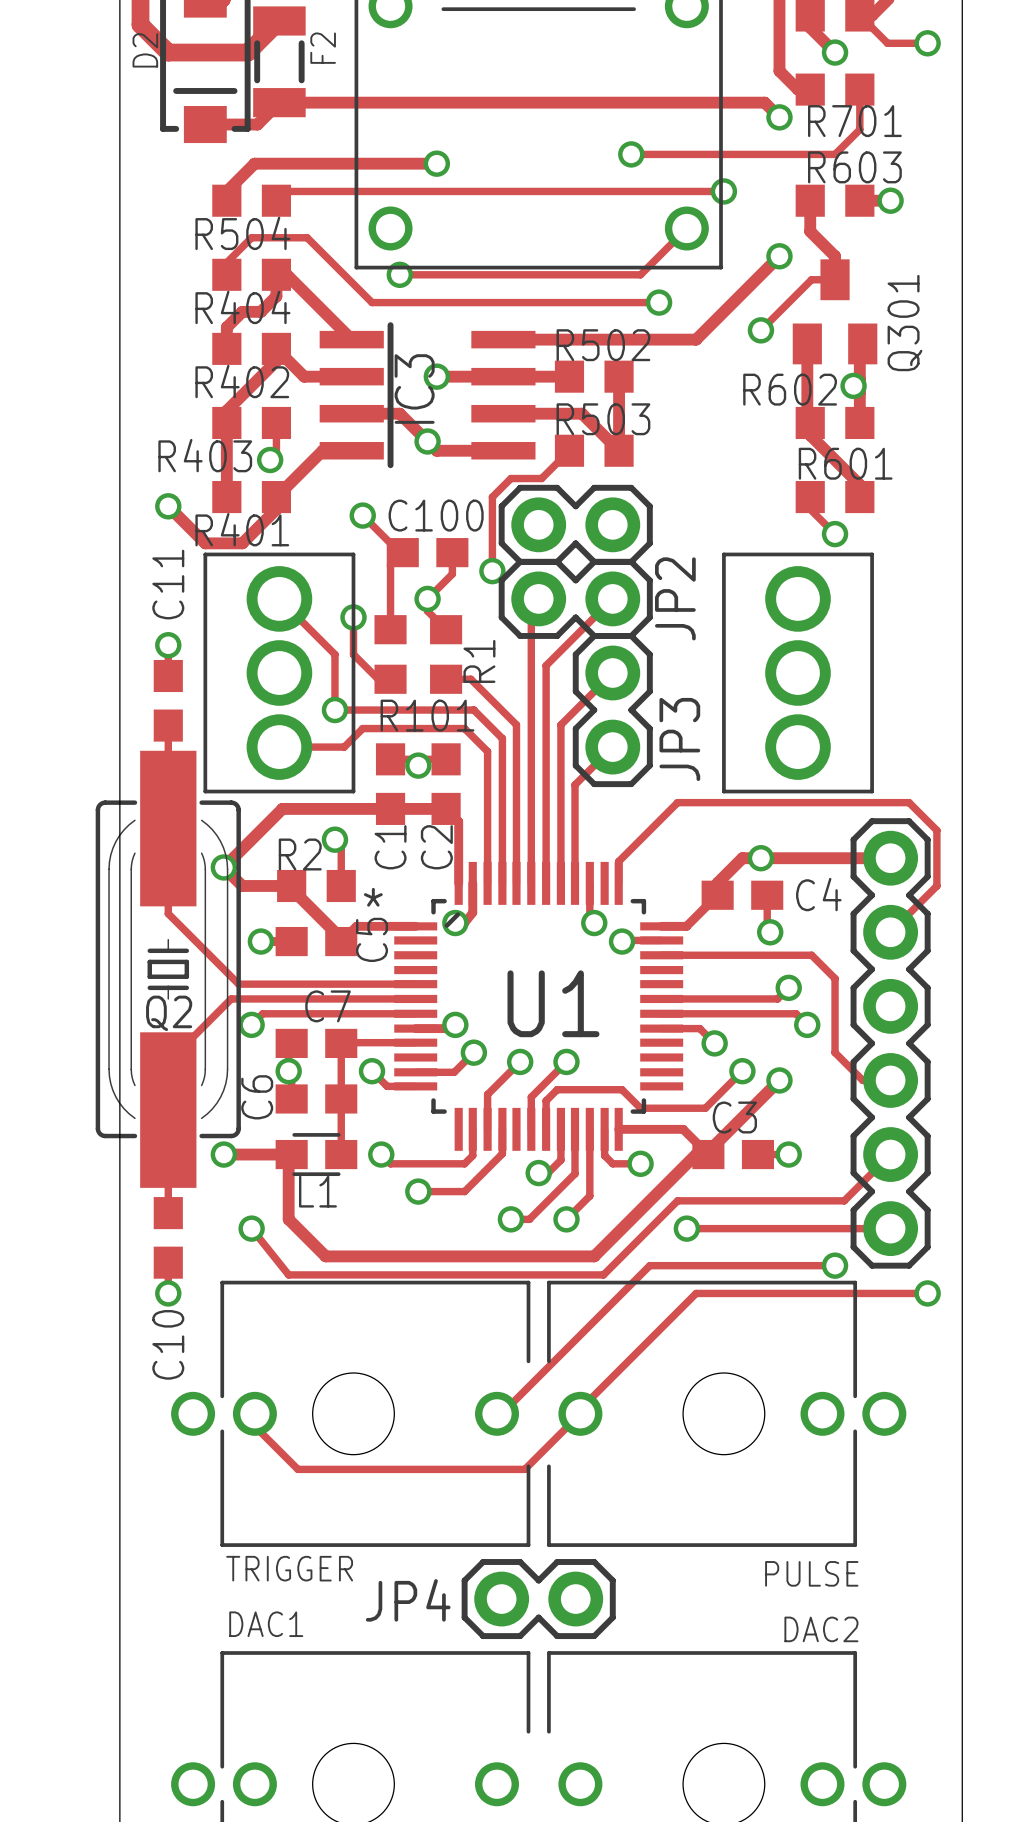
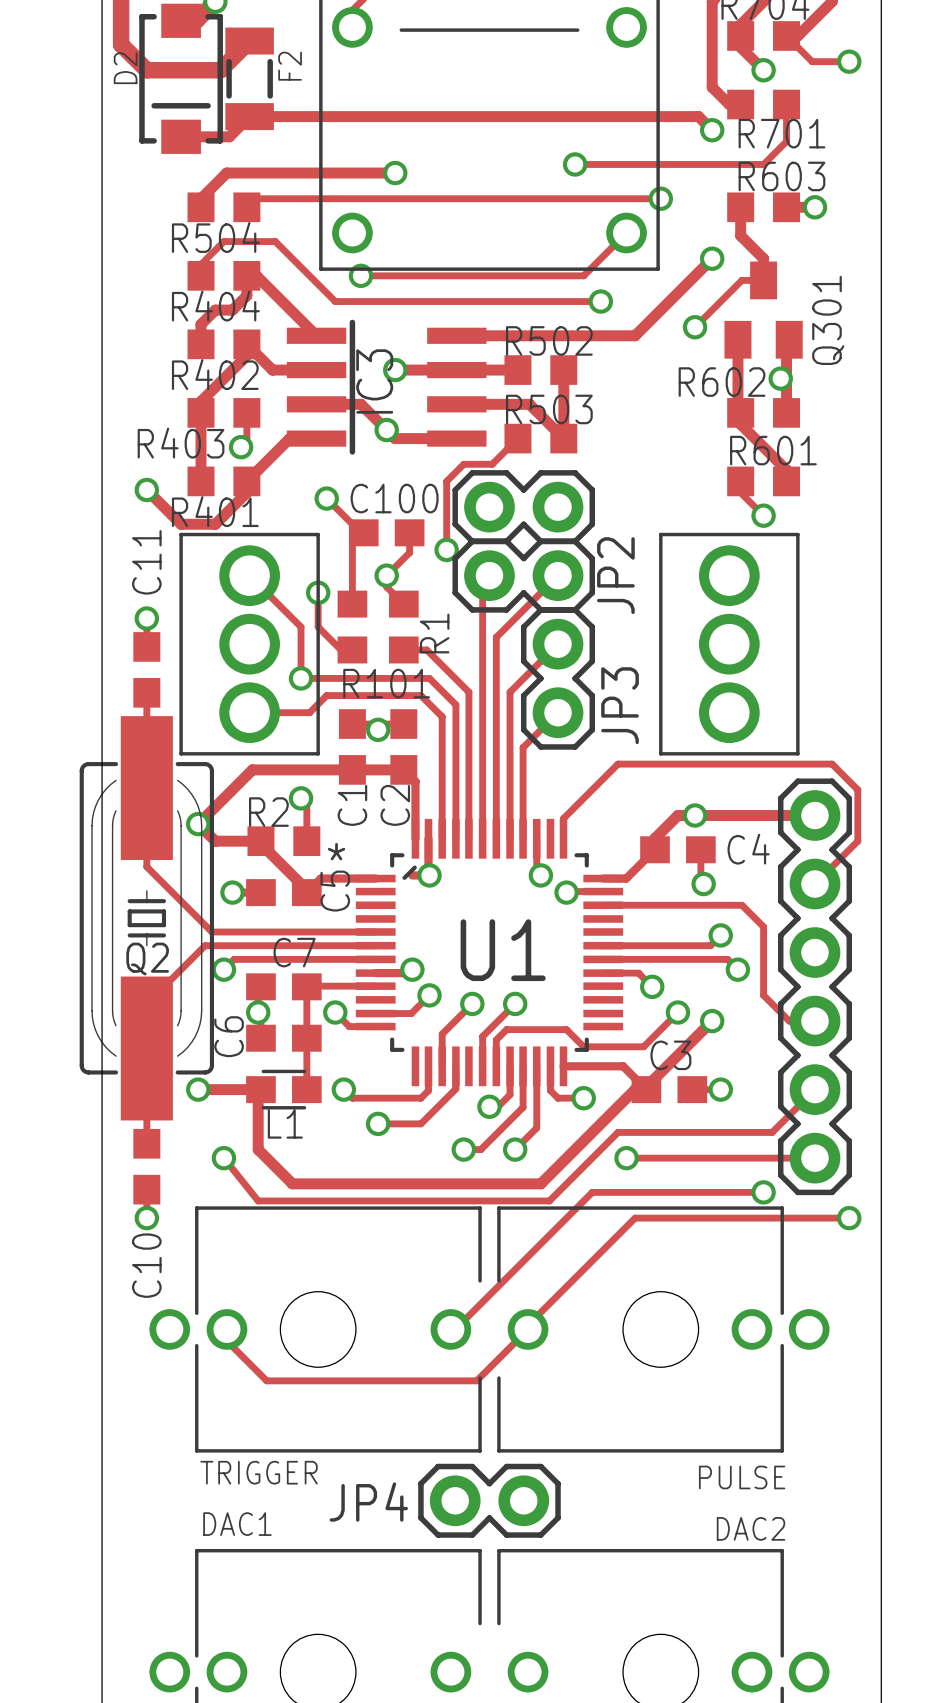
via position: (455, 923) -> (429, 875)

